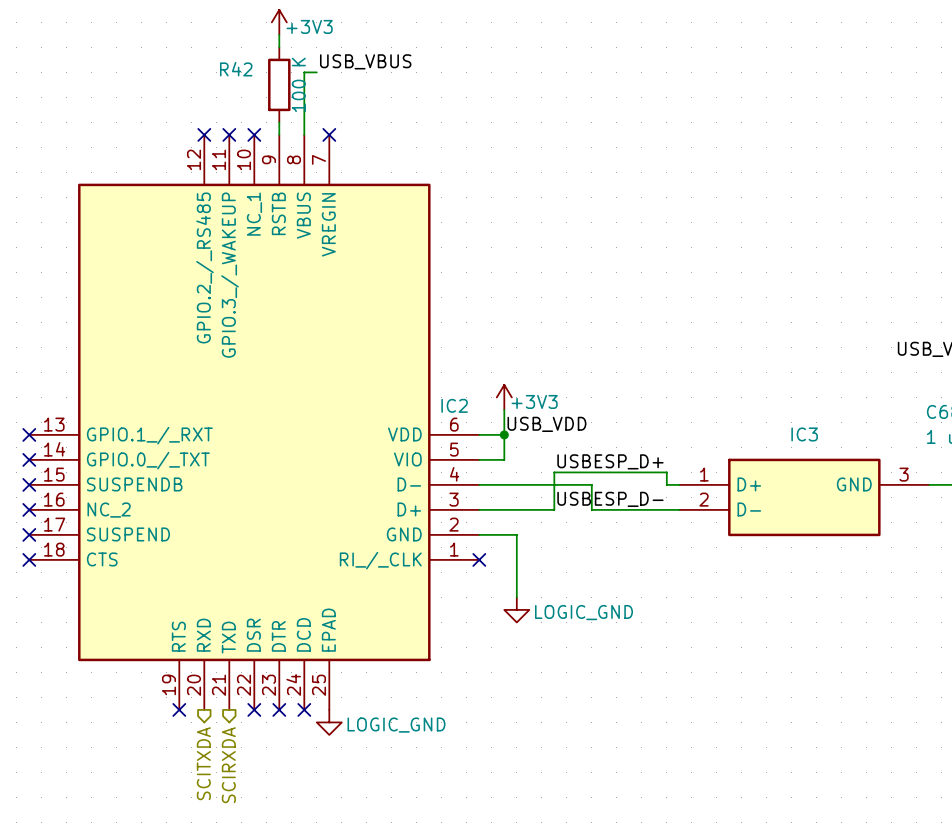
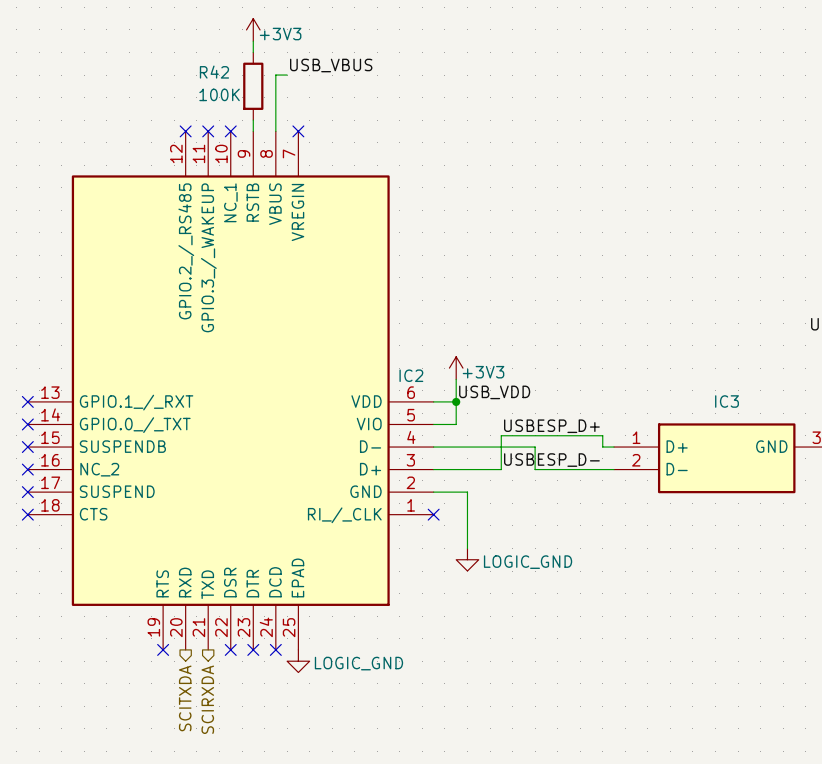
R42 value: 100 K (298, 84) -> 100K (219, 94)

